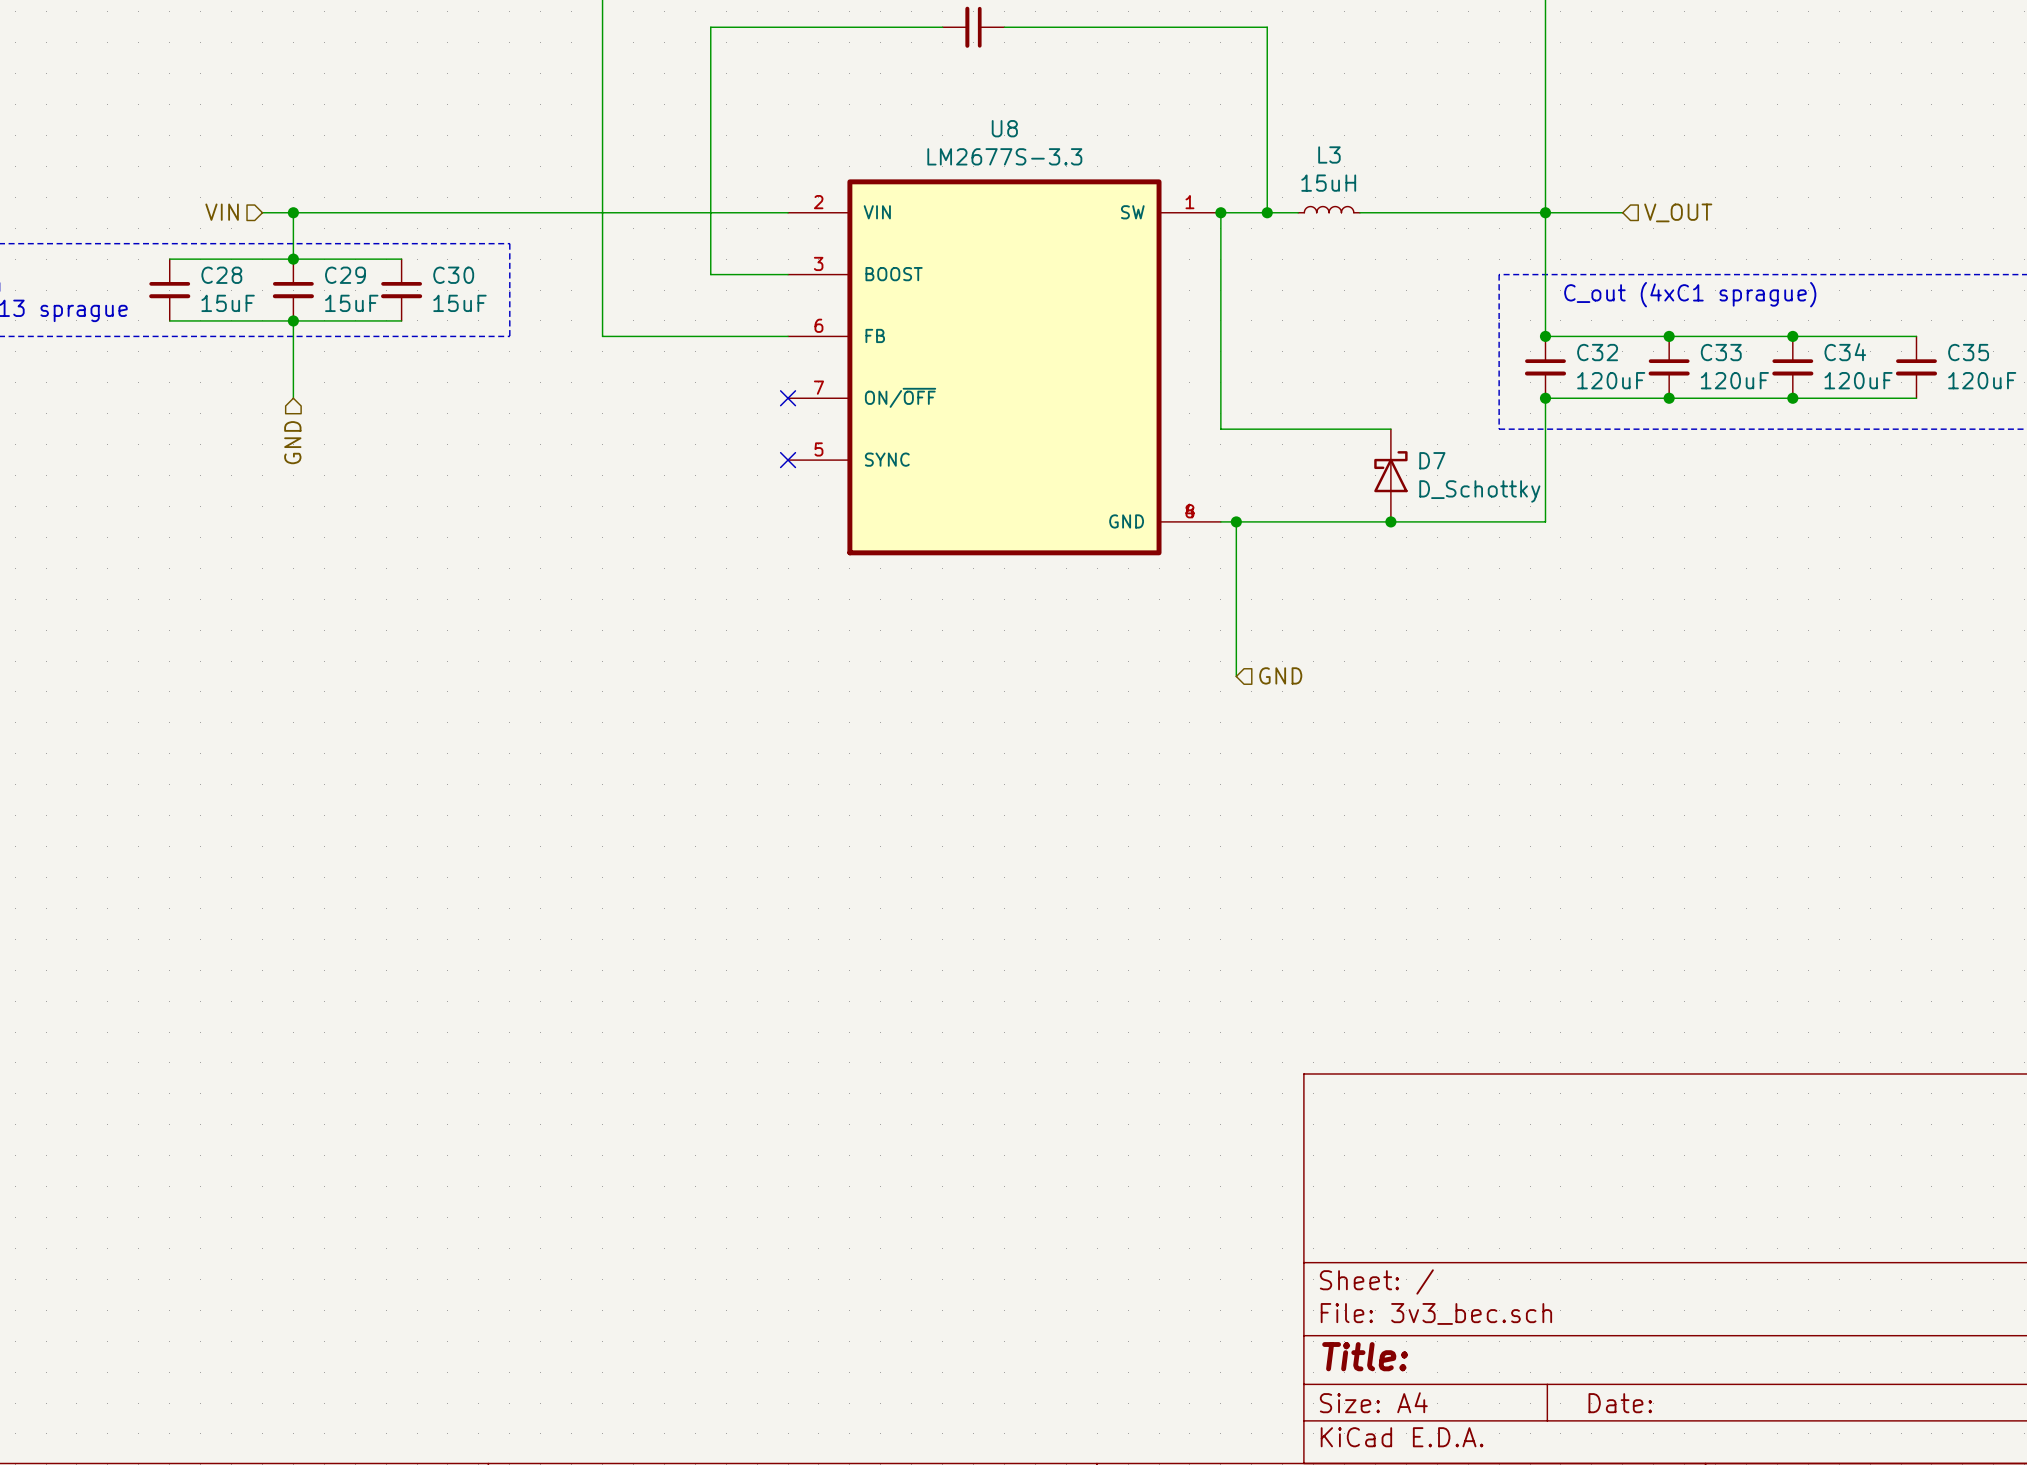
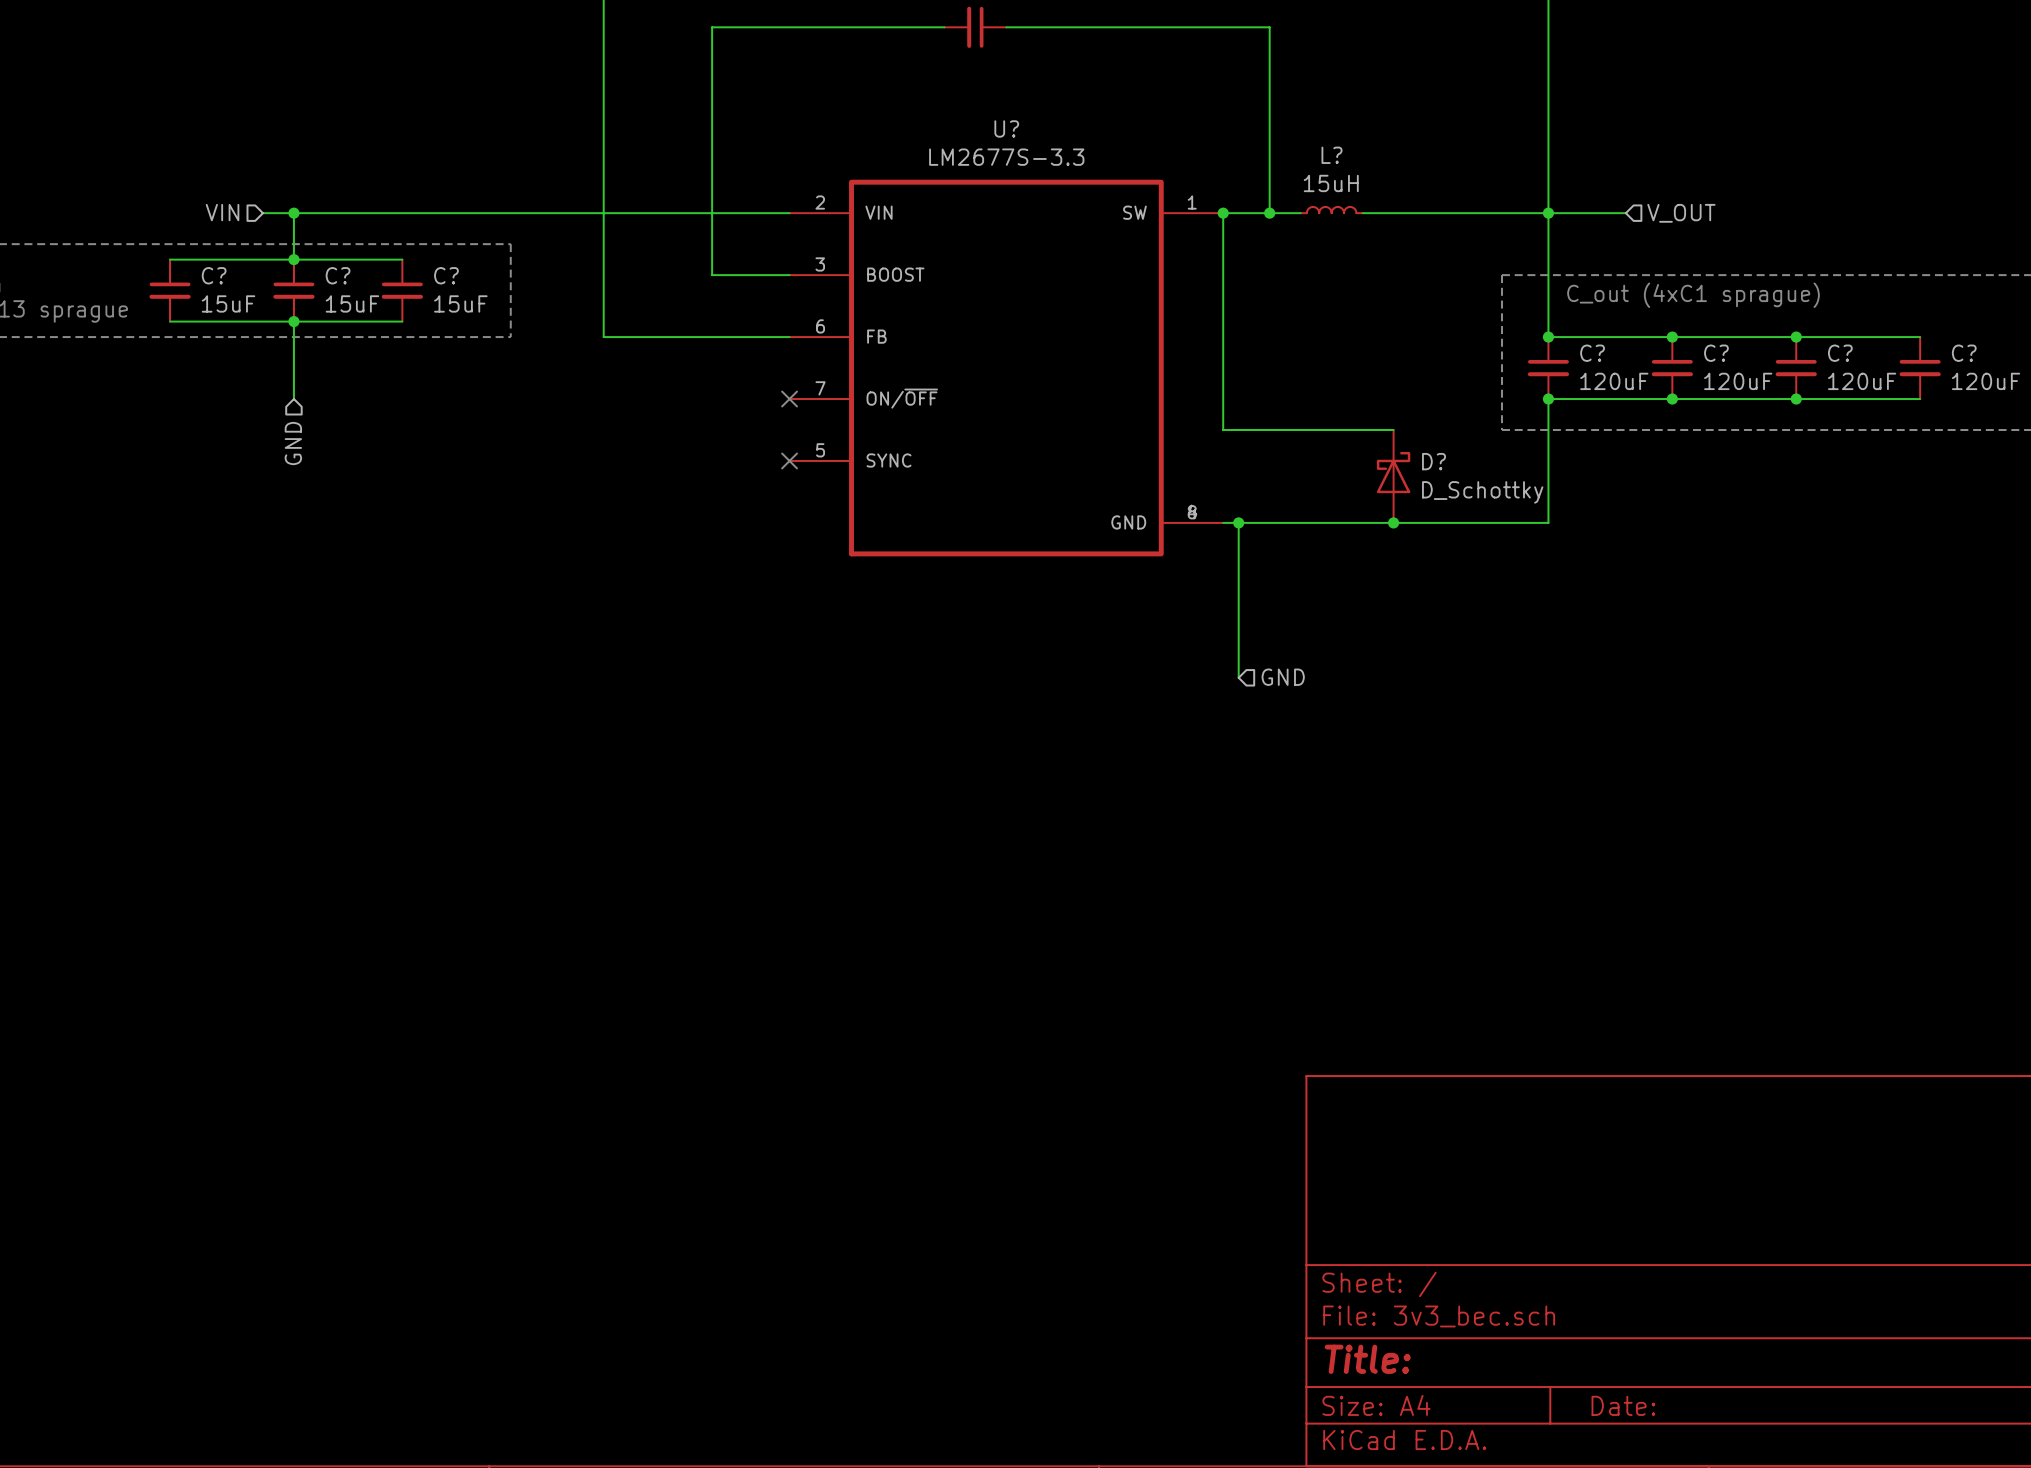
U8 name: U8 (1004, 128) -> U? (1006, 128)
L3 name: L3 (1329, 154) -> L? (1331, 155)
C28 name: C28 (221, 275) -> C? (214, 275)
C29 name: C29 (345, 275) -> C? (338, 275)
C30 name: C30 (453, 275) -> C? (446, 275)
C32 name: C32 (1597, 352) -> C? (1592, 353)
C33 name: C33 (1721, 352) -> C? (1716, 353)
C34 name: C34 (1845, 352) -> C? (1840, 353)
C35 name: C35 (1968, 352) -> C? (1964, 353)
D7 name: D7 (1432, 460) -> D? (1434, 461)

